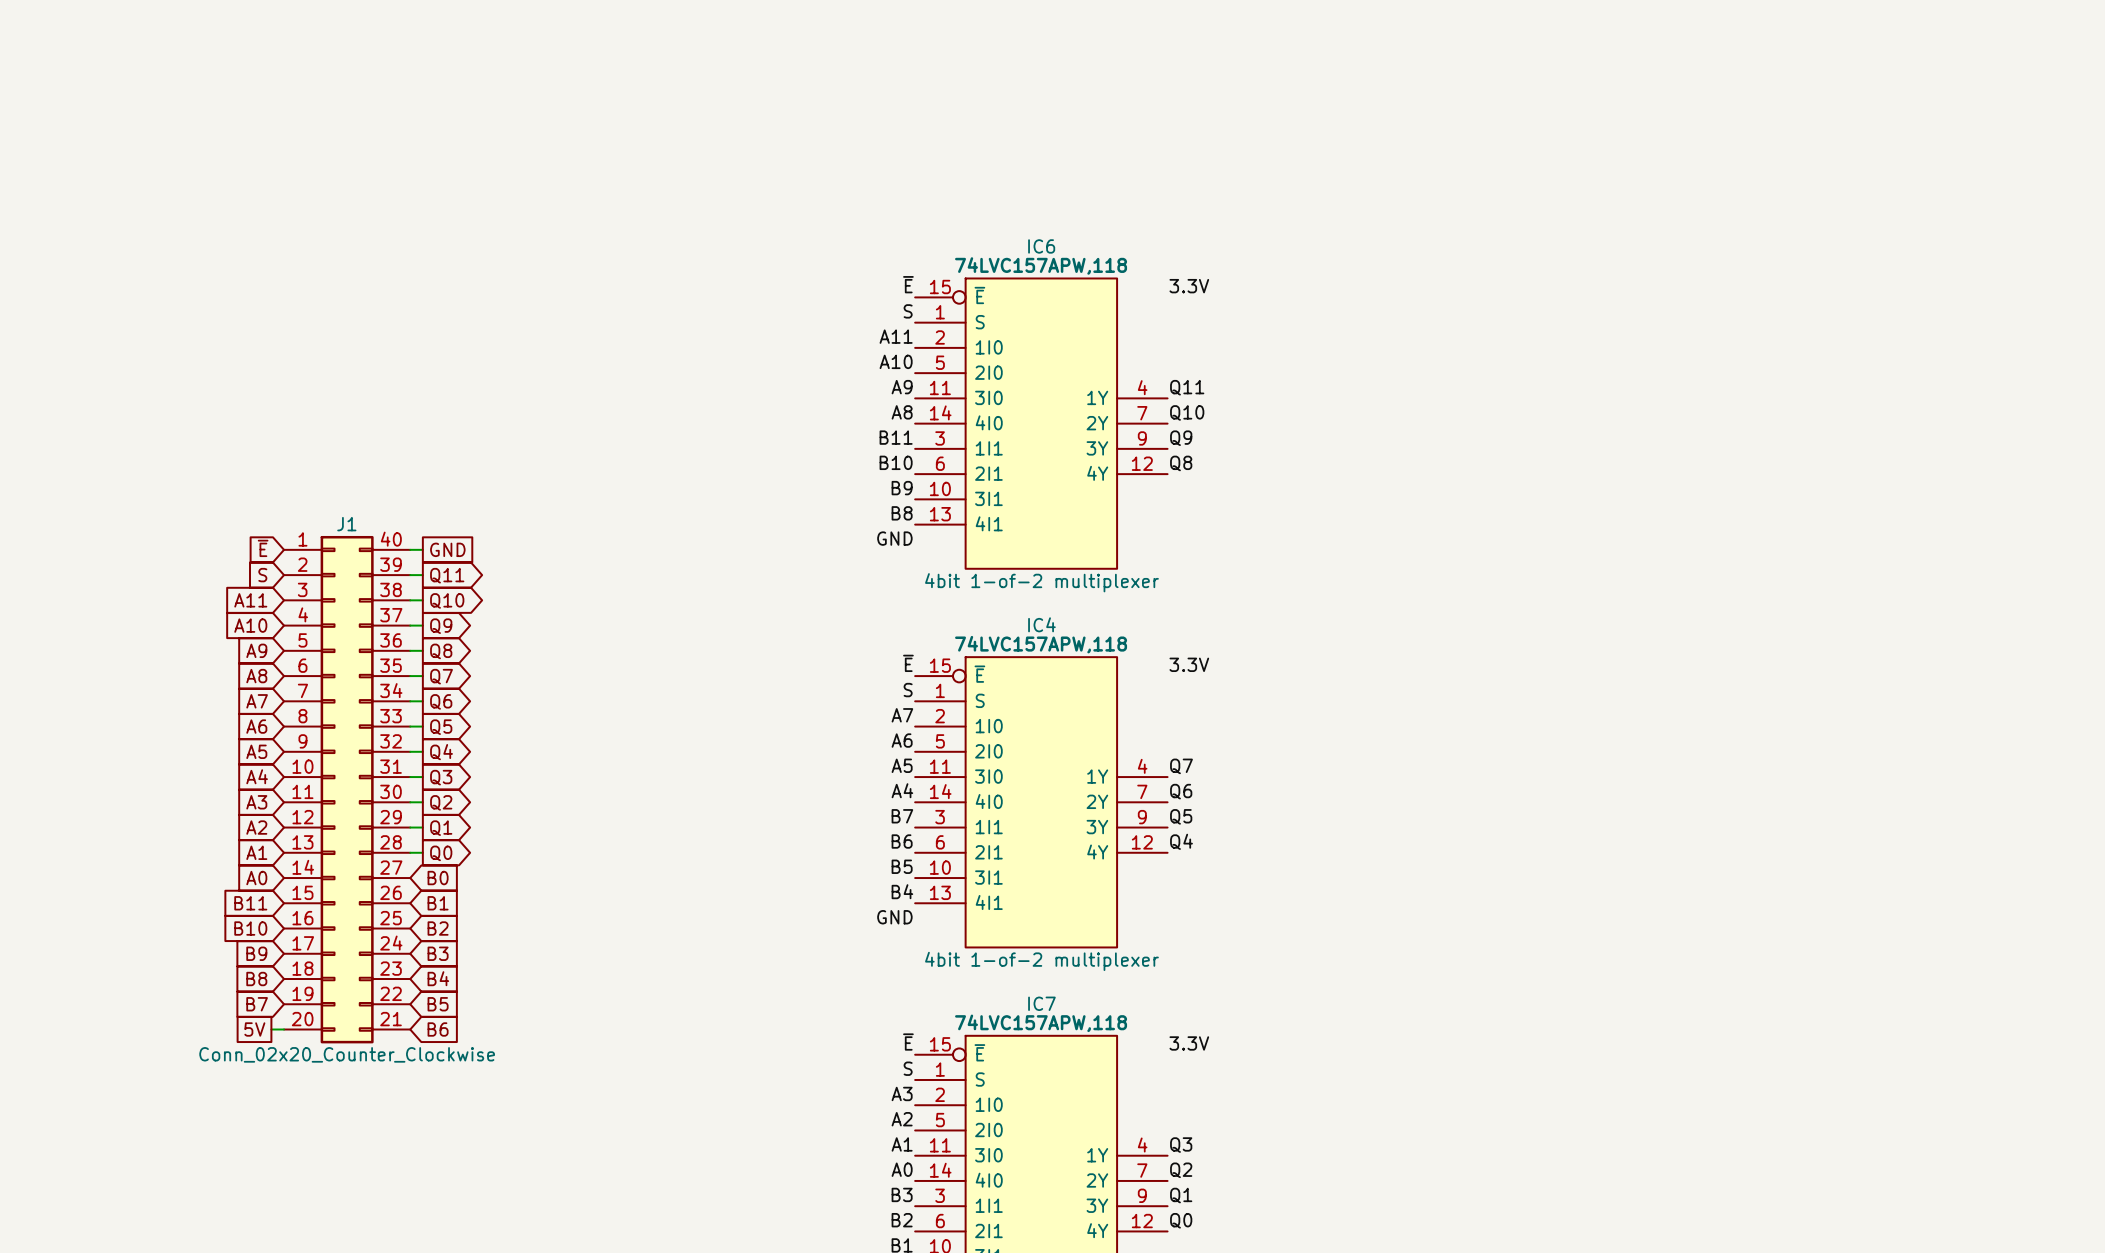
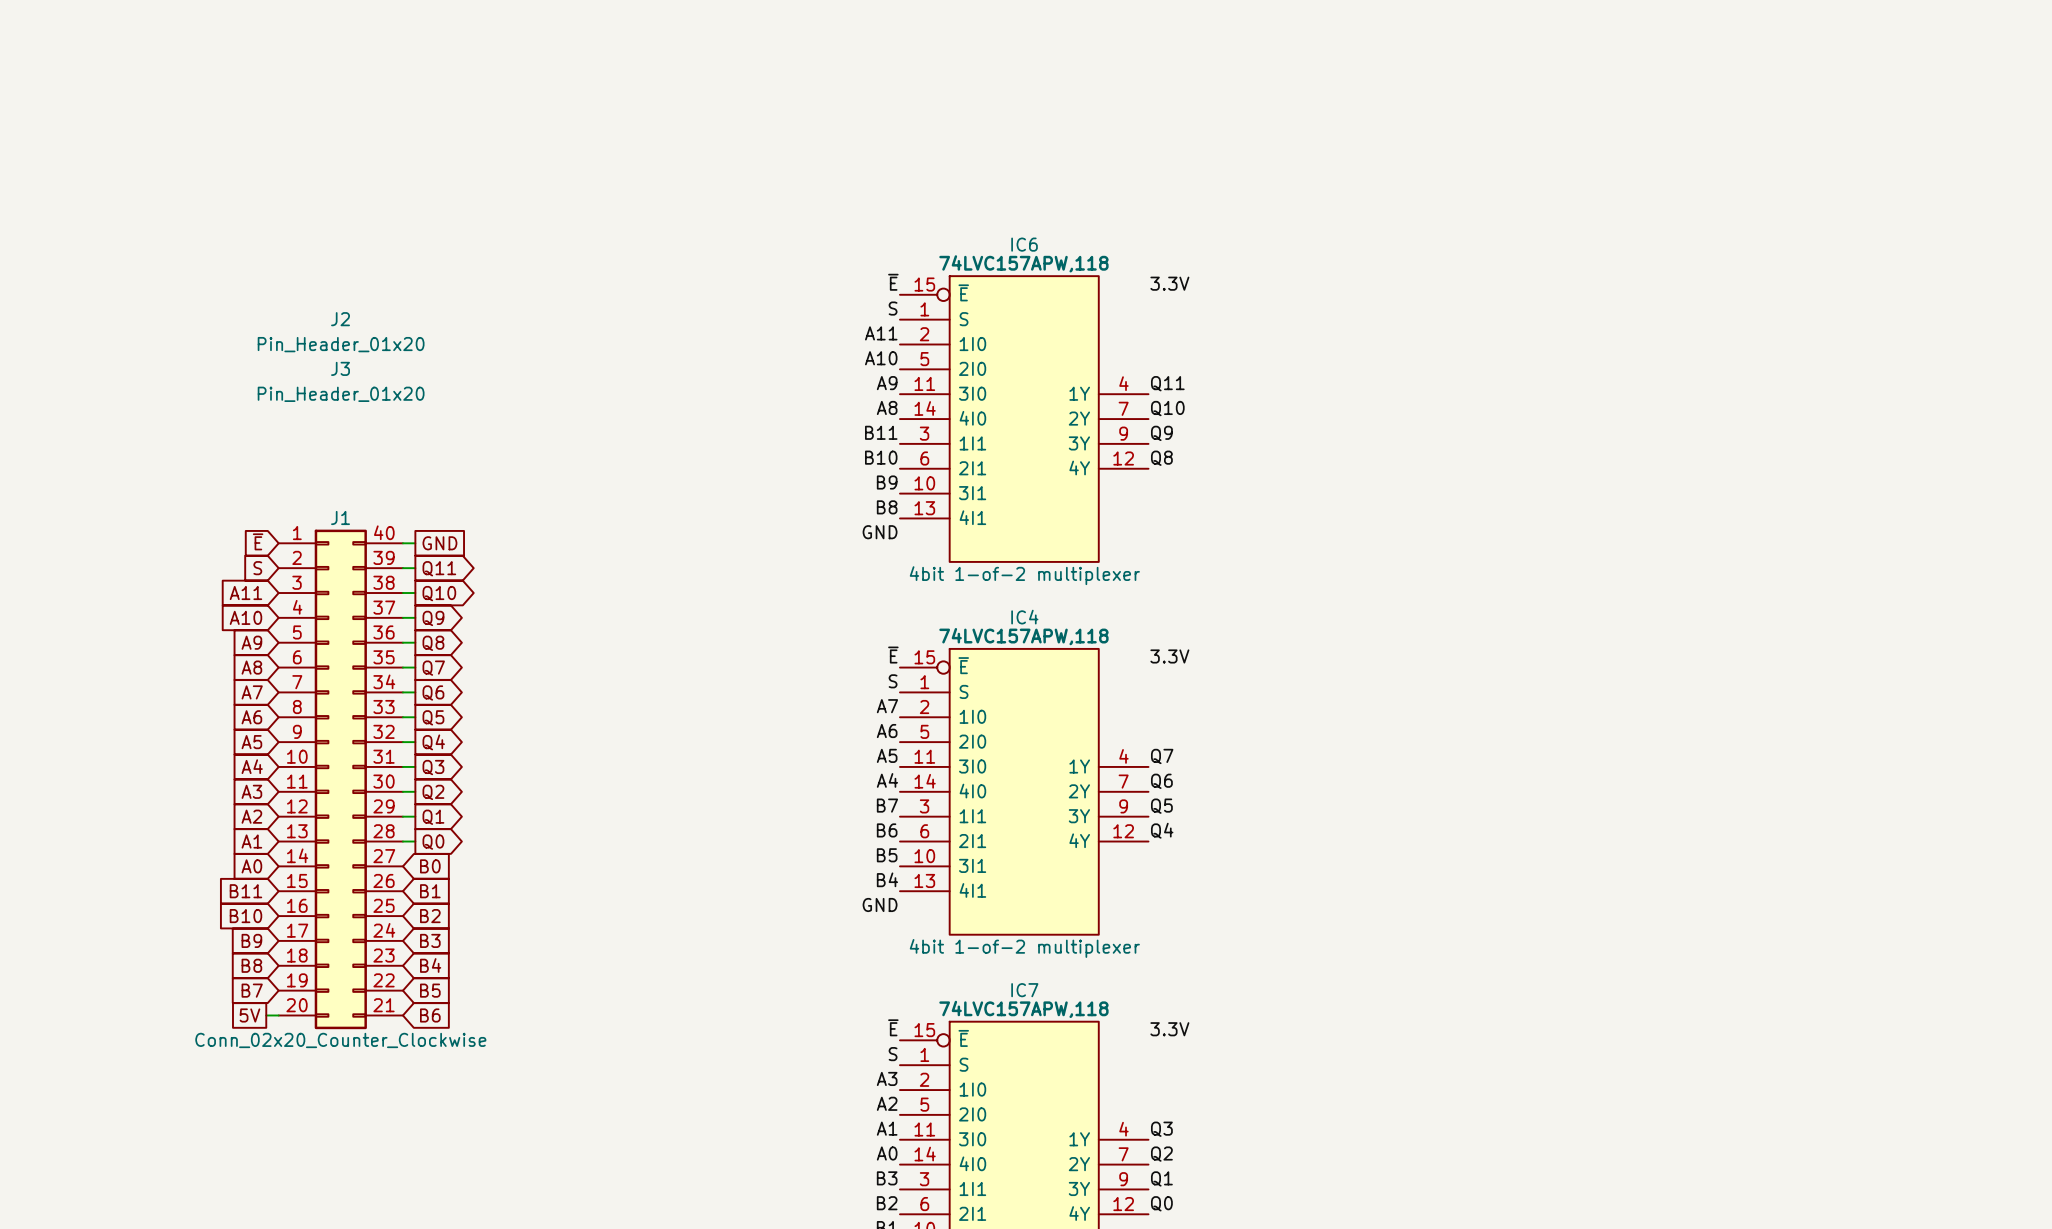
J2: none -> Pin_Header_01x20 (341, 332)
J3: none -> Pin_Header_01x20 (341, 381)

